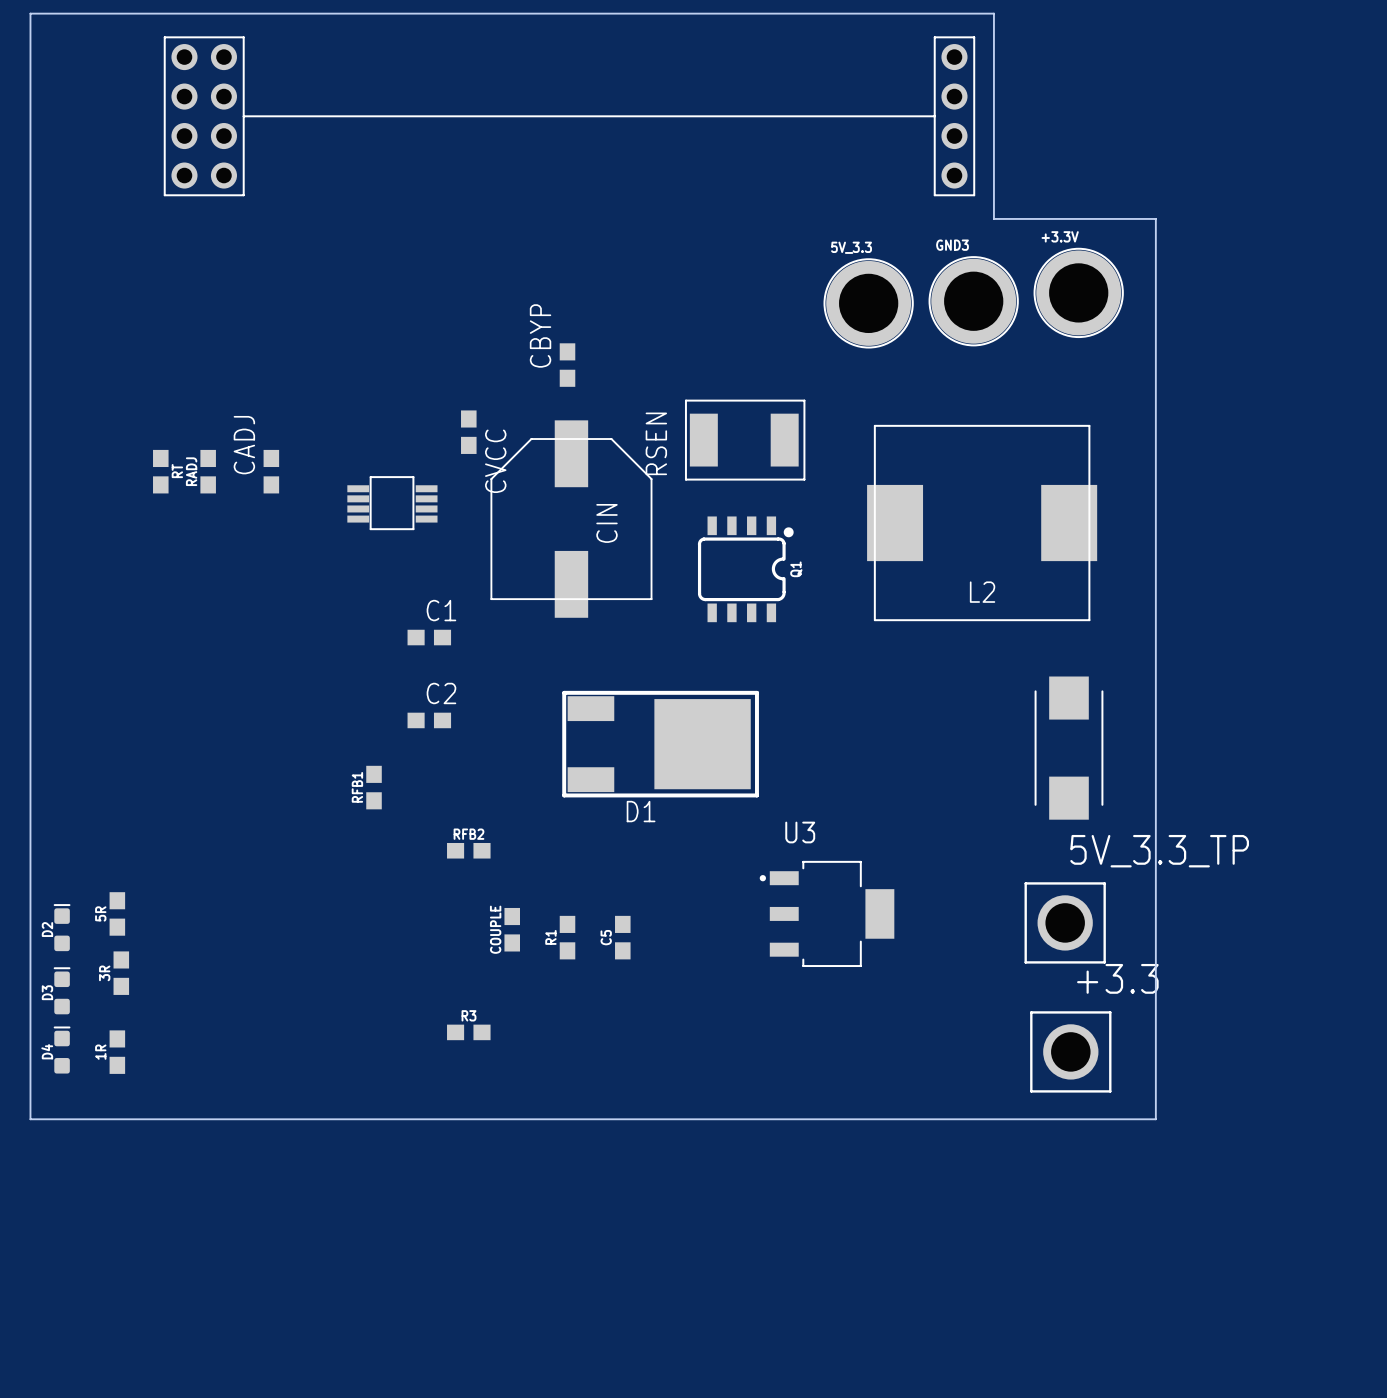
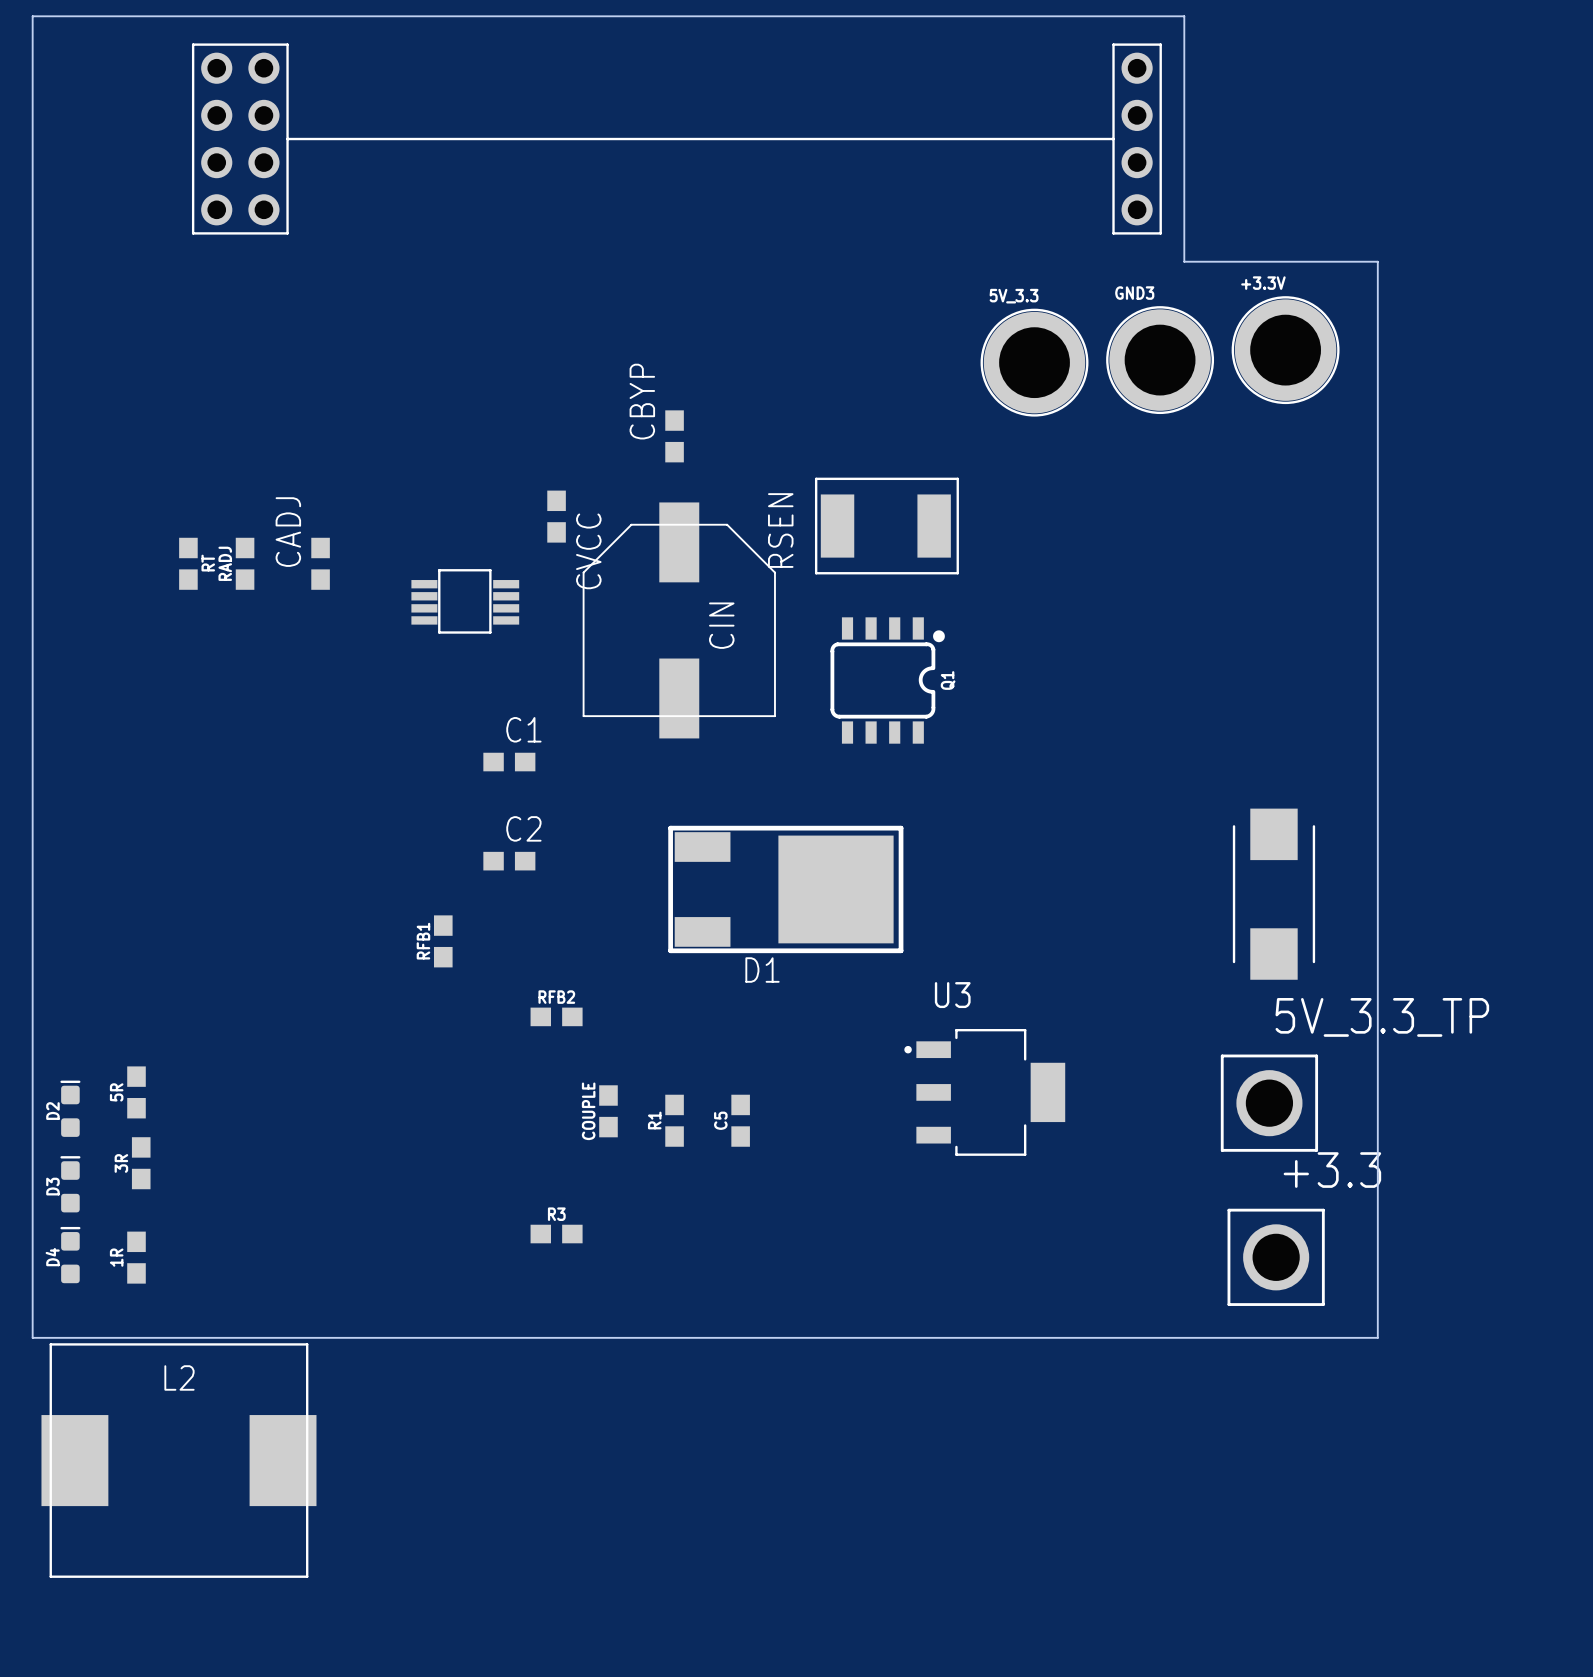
L2 position: (982, 523) -> (178, 1460)
L2 name position: L2 (982, 592) -> L2 (179, 1377)

